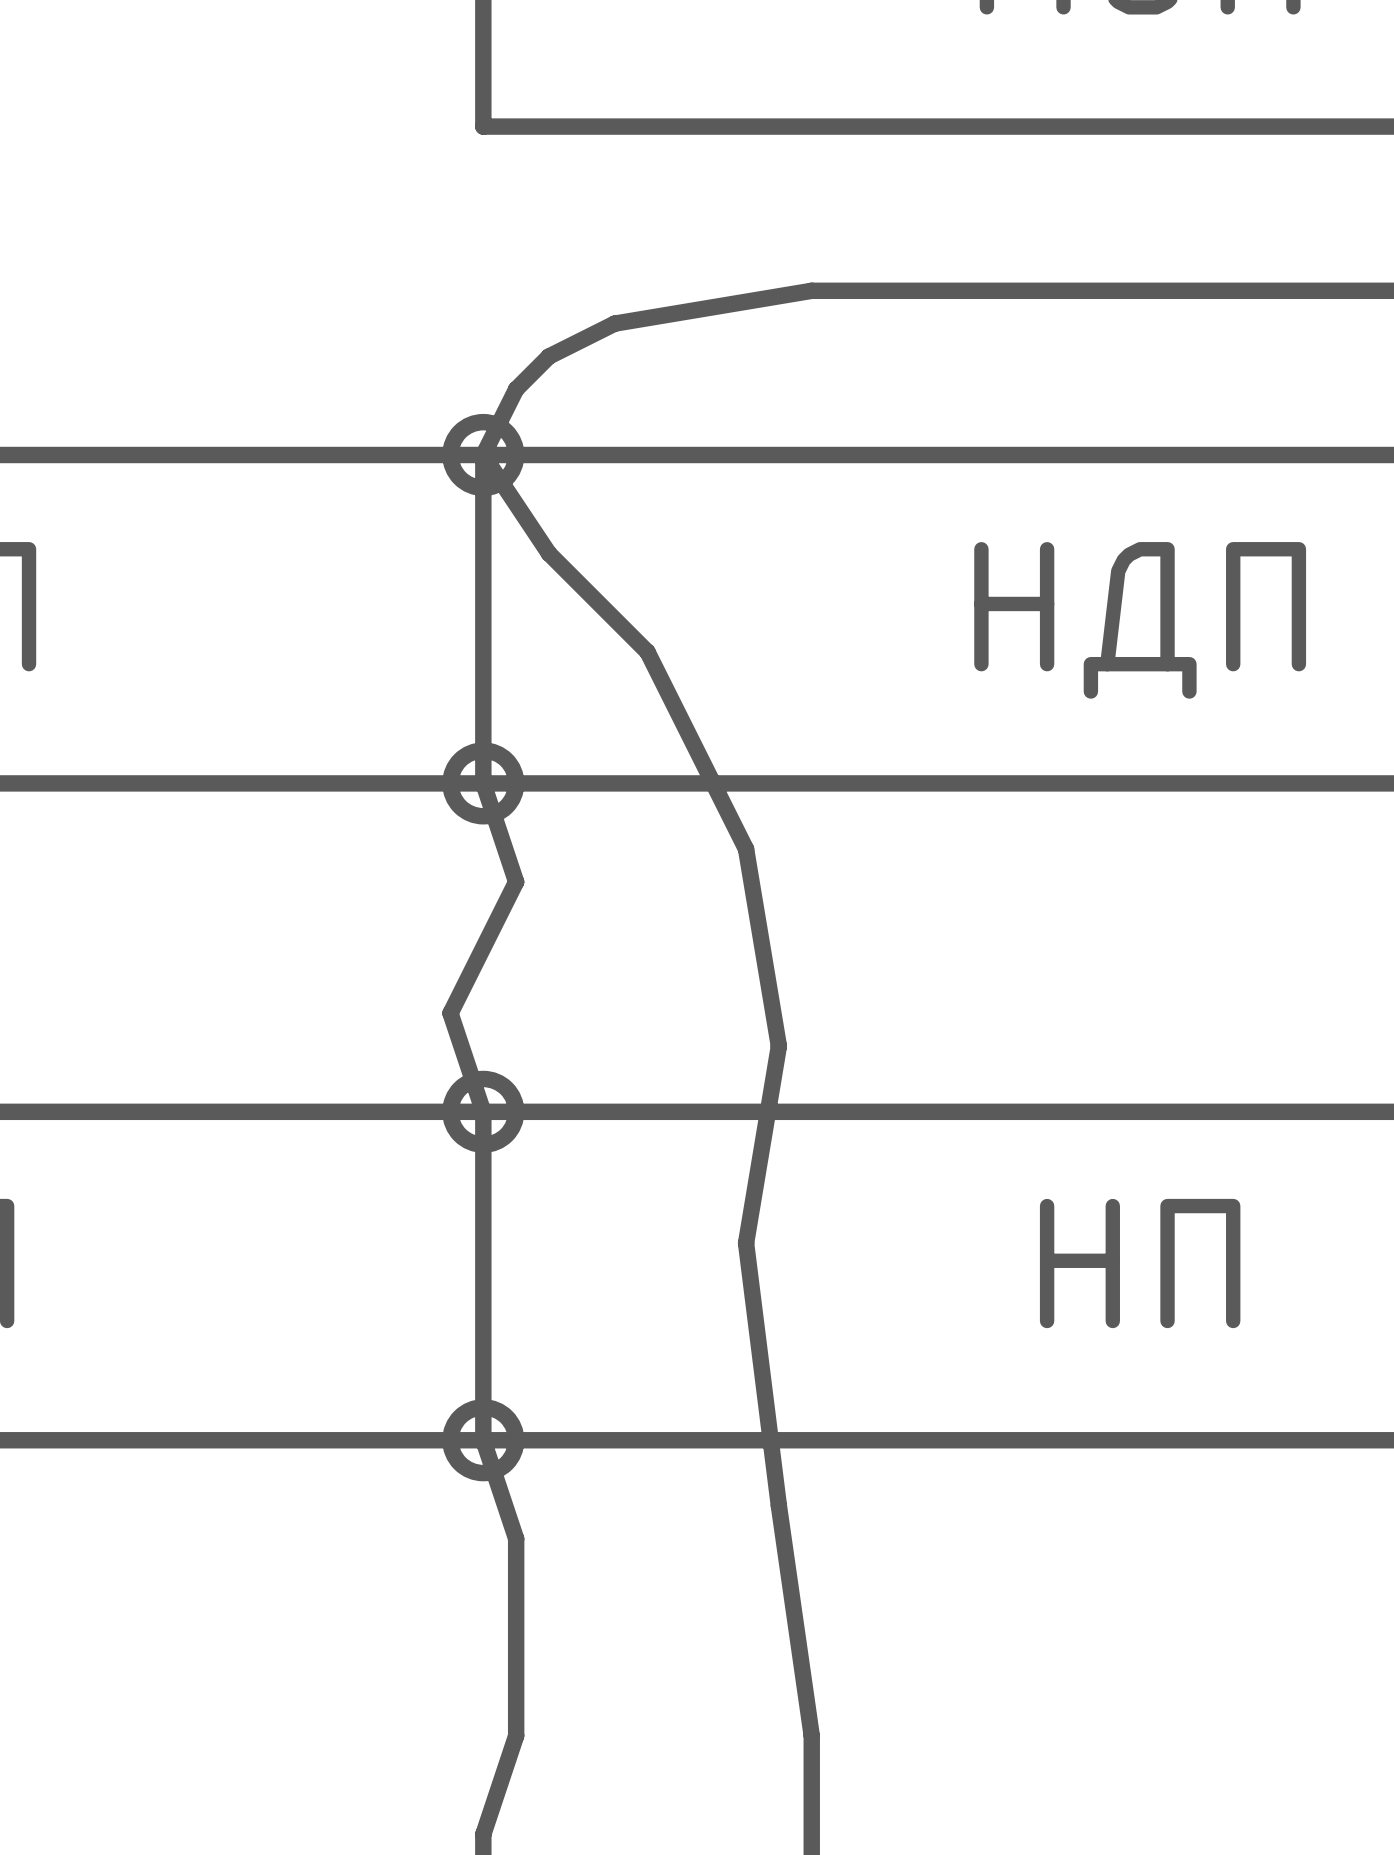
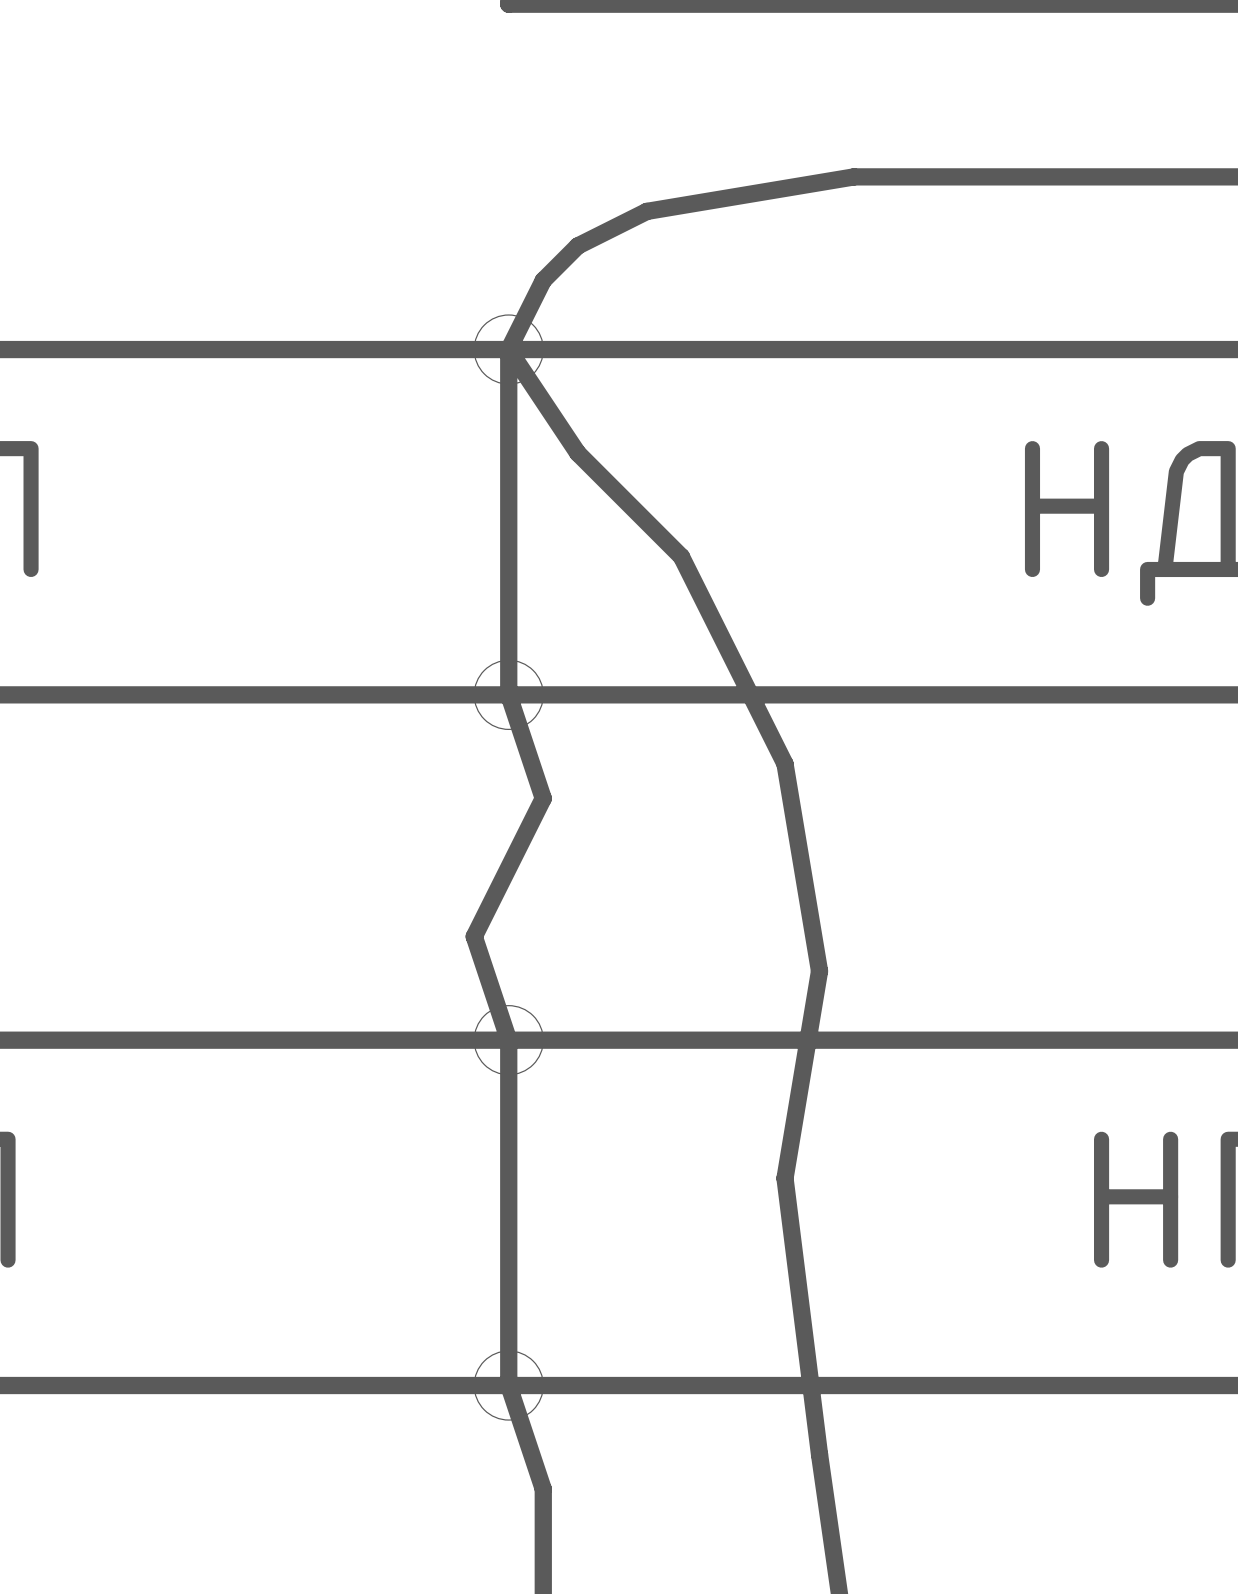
drawing shape: [442, 413, 525, 497] -> [474, 315, 544, 385]
drawing shape: [442, 742, 525, 825] -> [474, 660, 544, 730]
drawing shape: [442, 1070, 525, 1153] -> [474, 1005, 544, 1075]
drawing shape: [442, 1399, 525, 1482] -> [474, 1350, 544, 1421]

